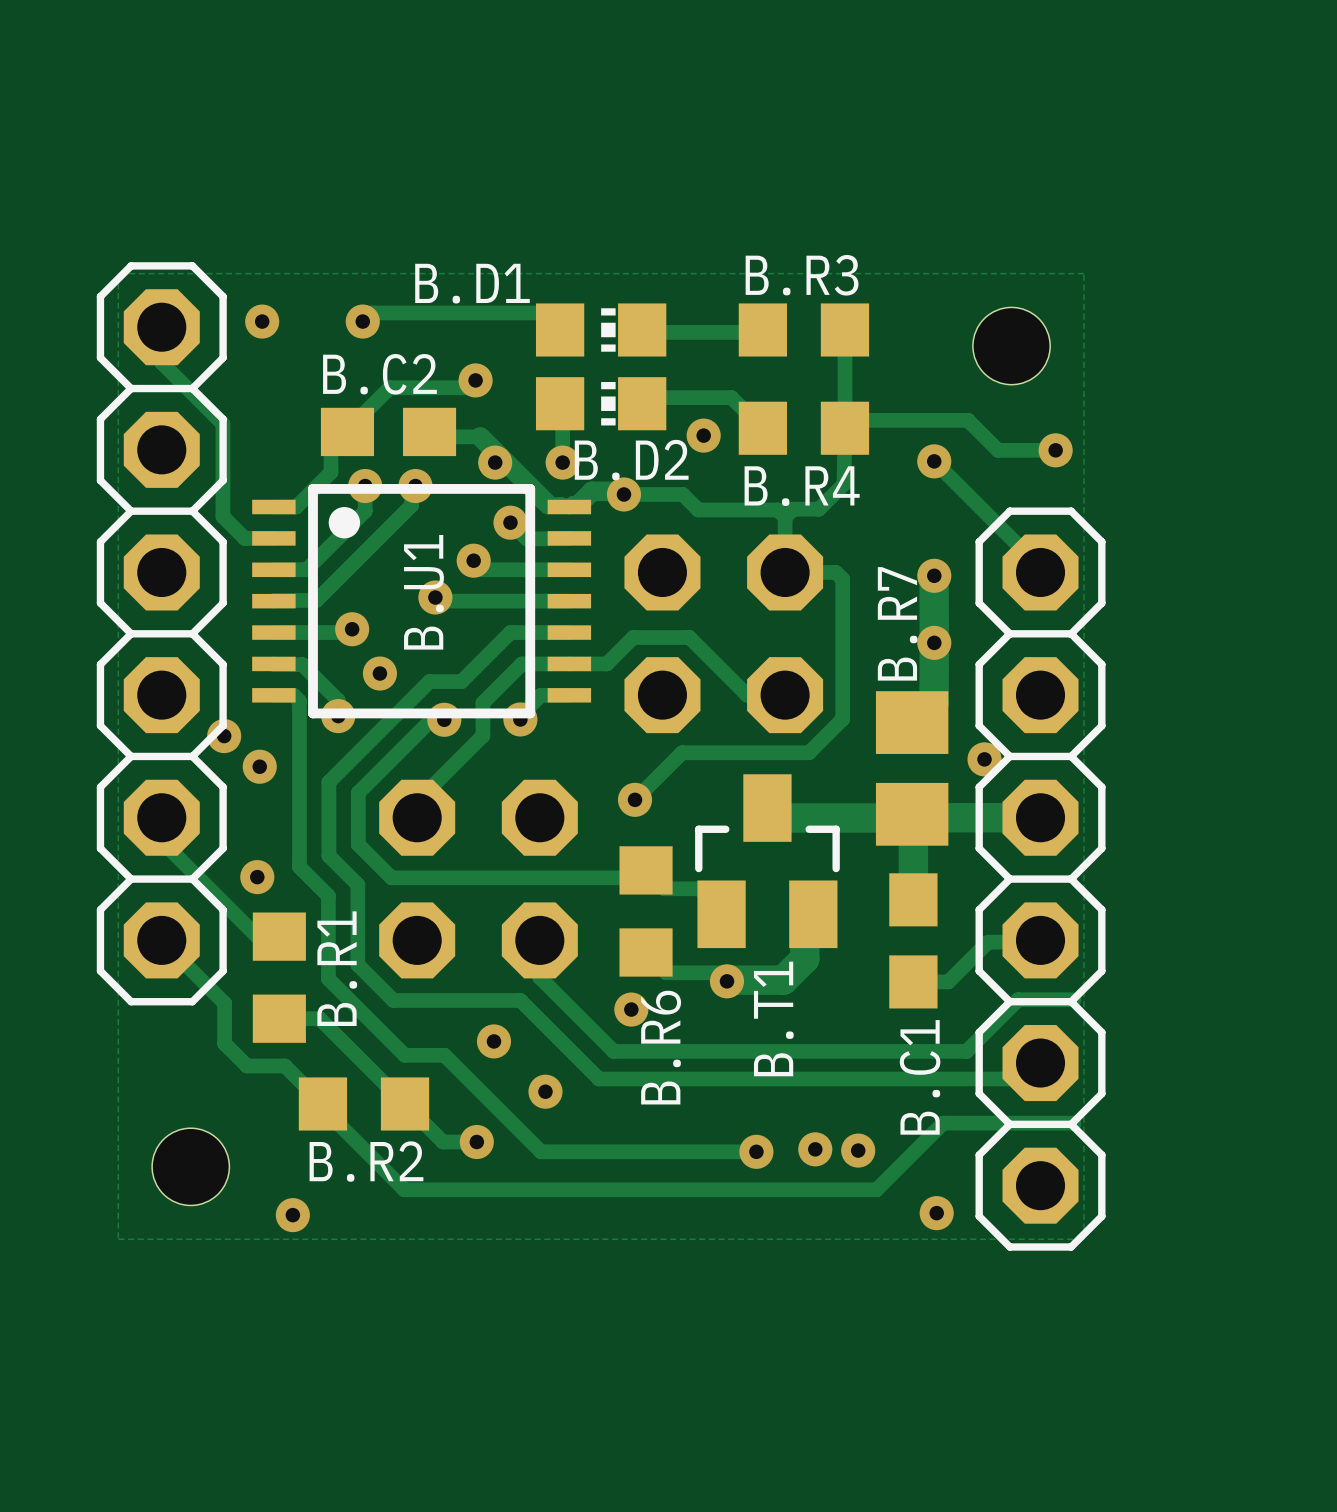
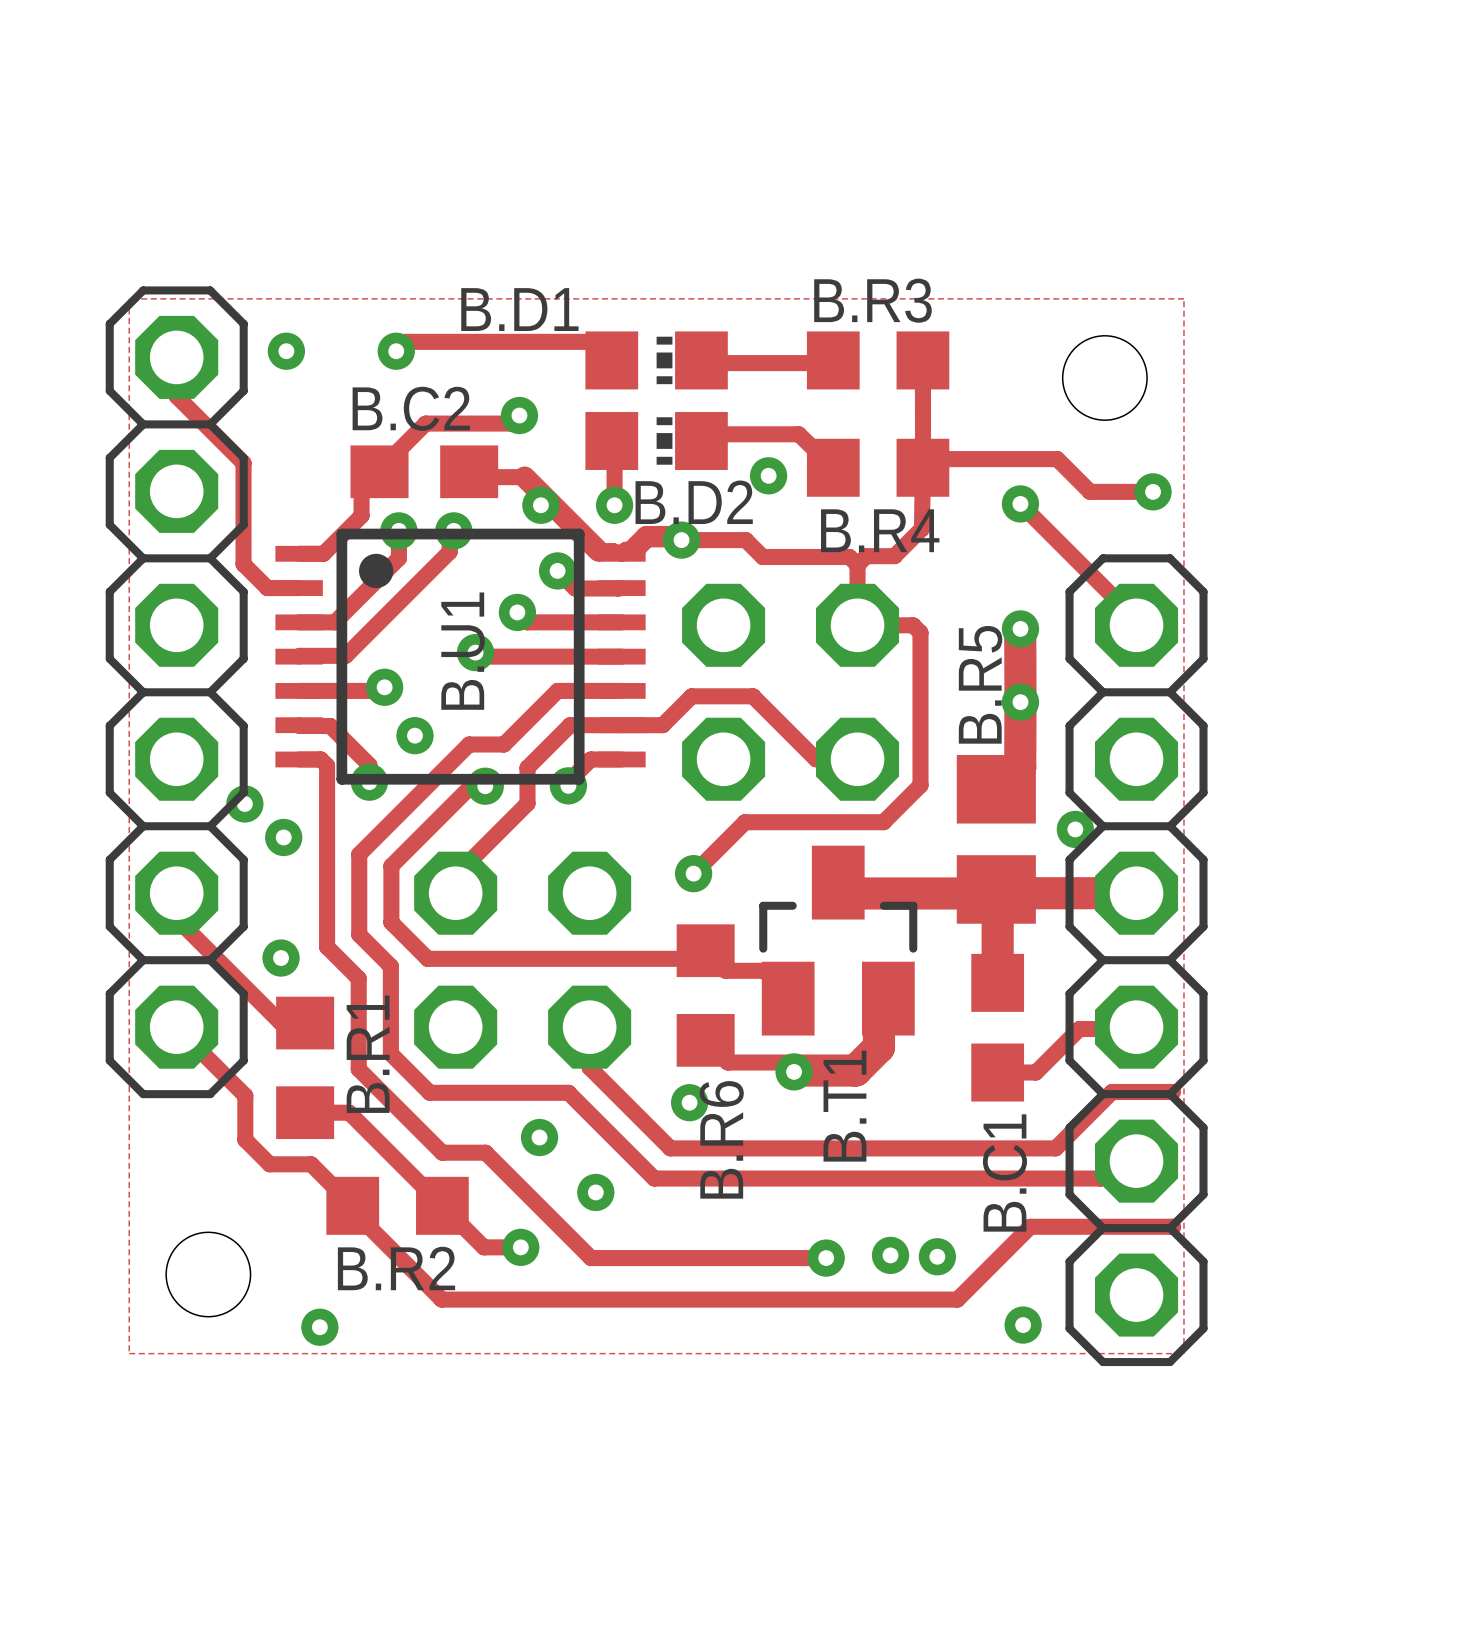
B.R7 name: B.R7 (897, 623) -> B.R5 (980, 684)

